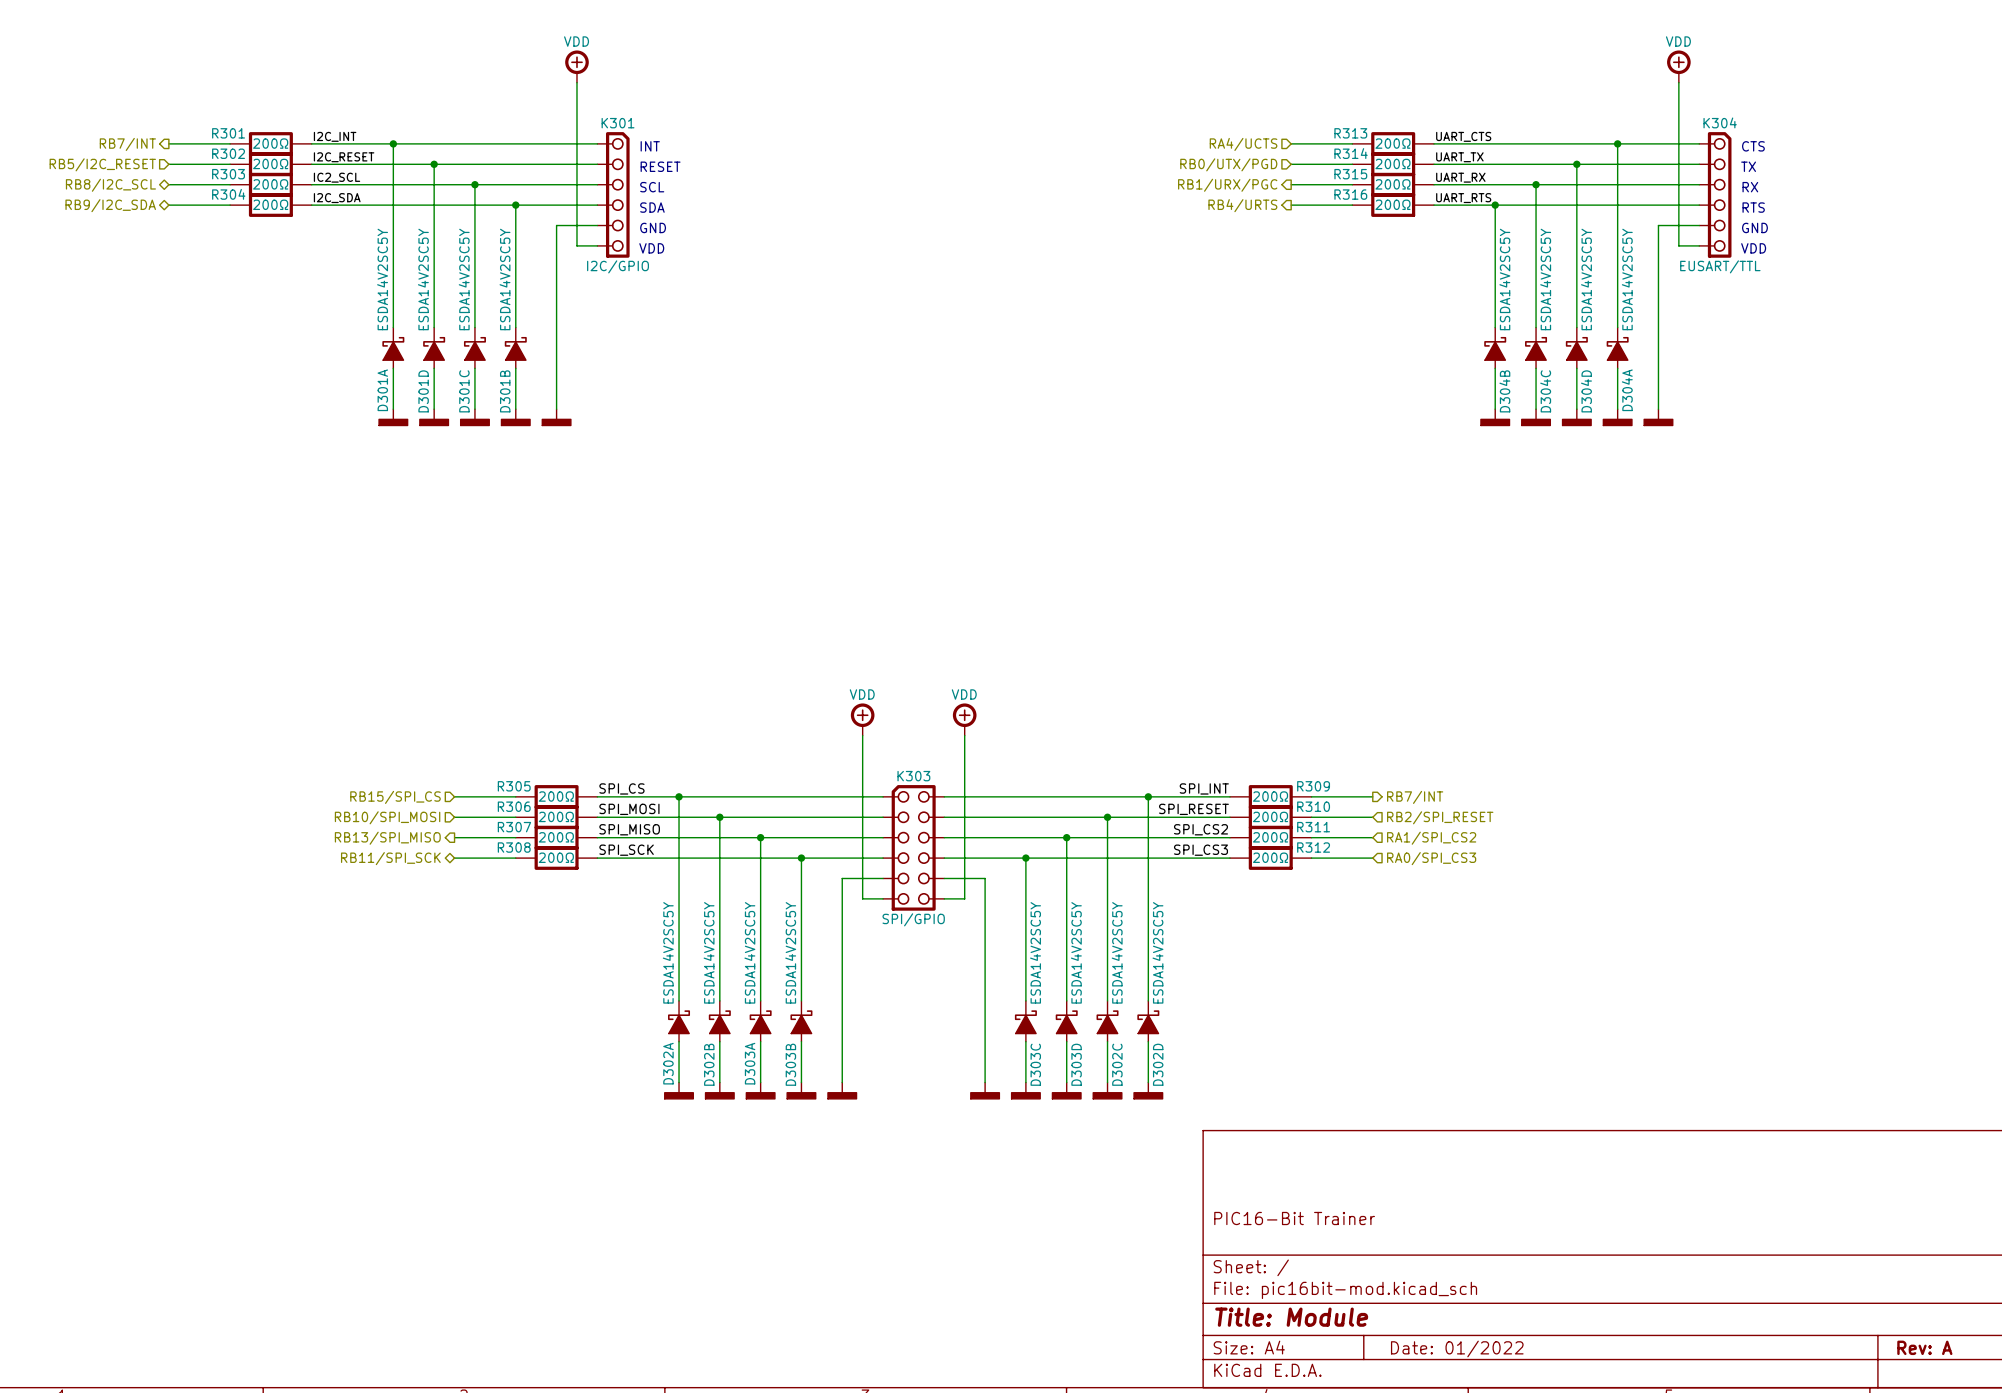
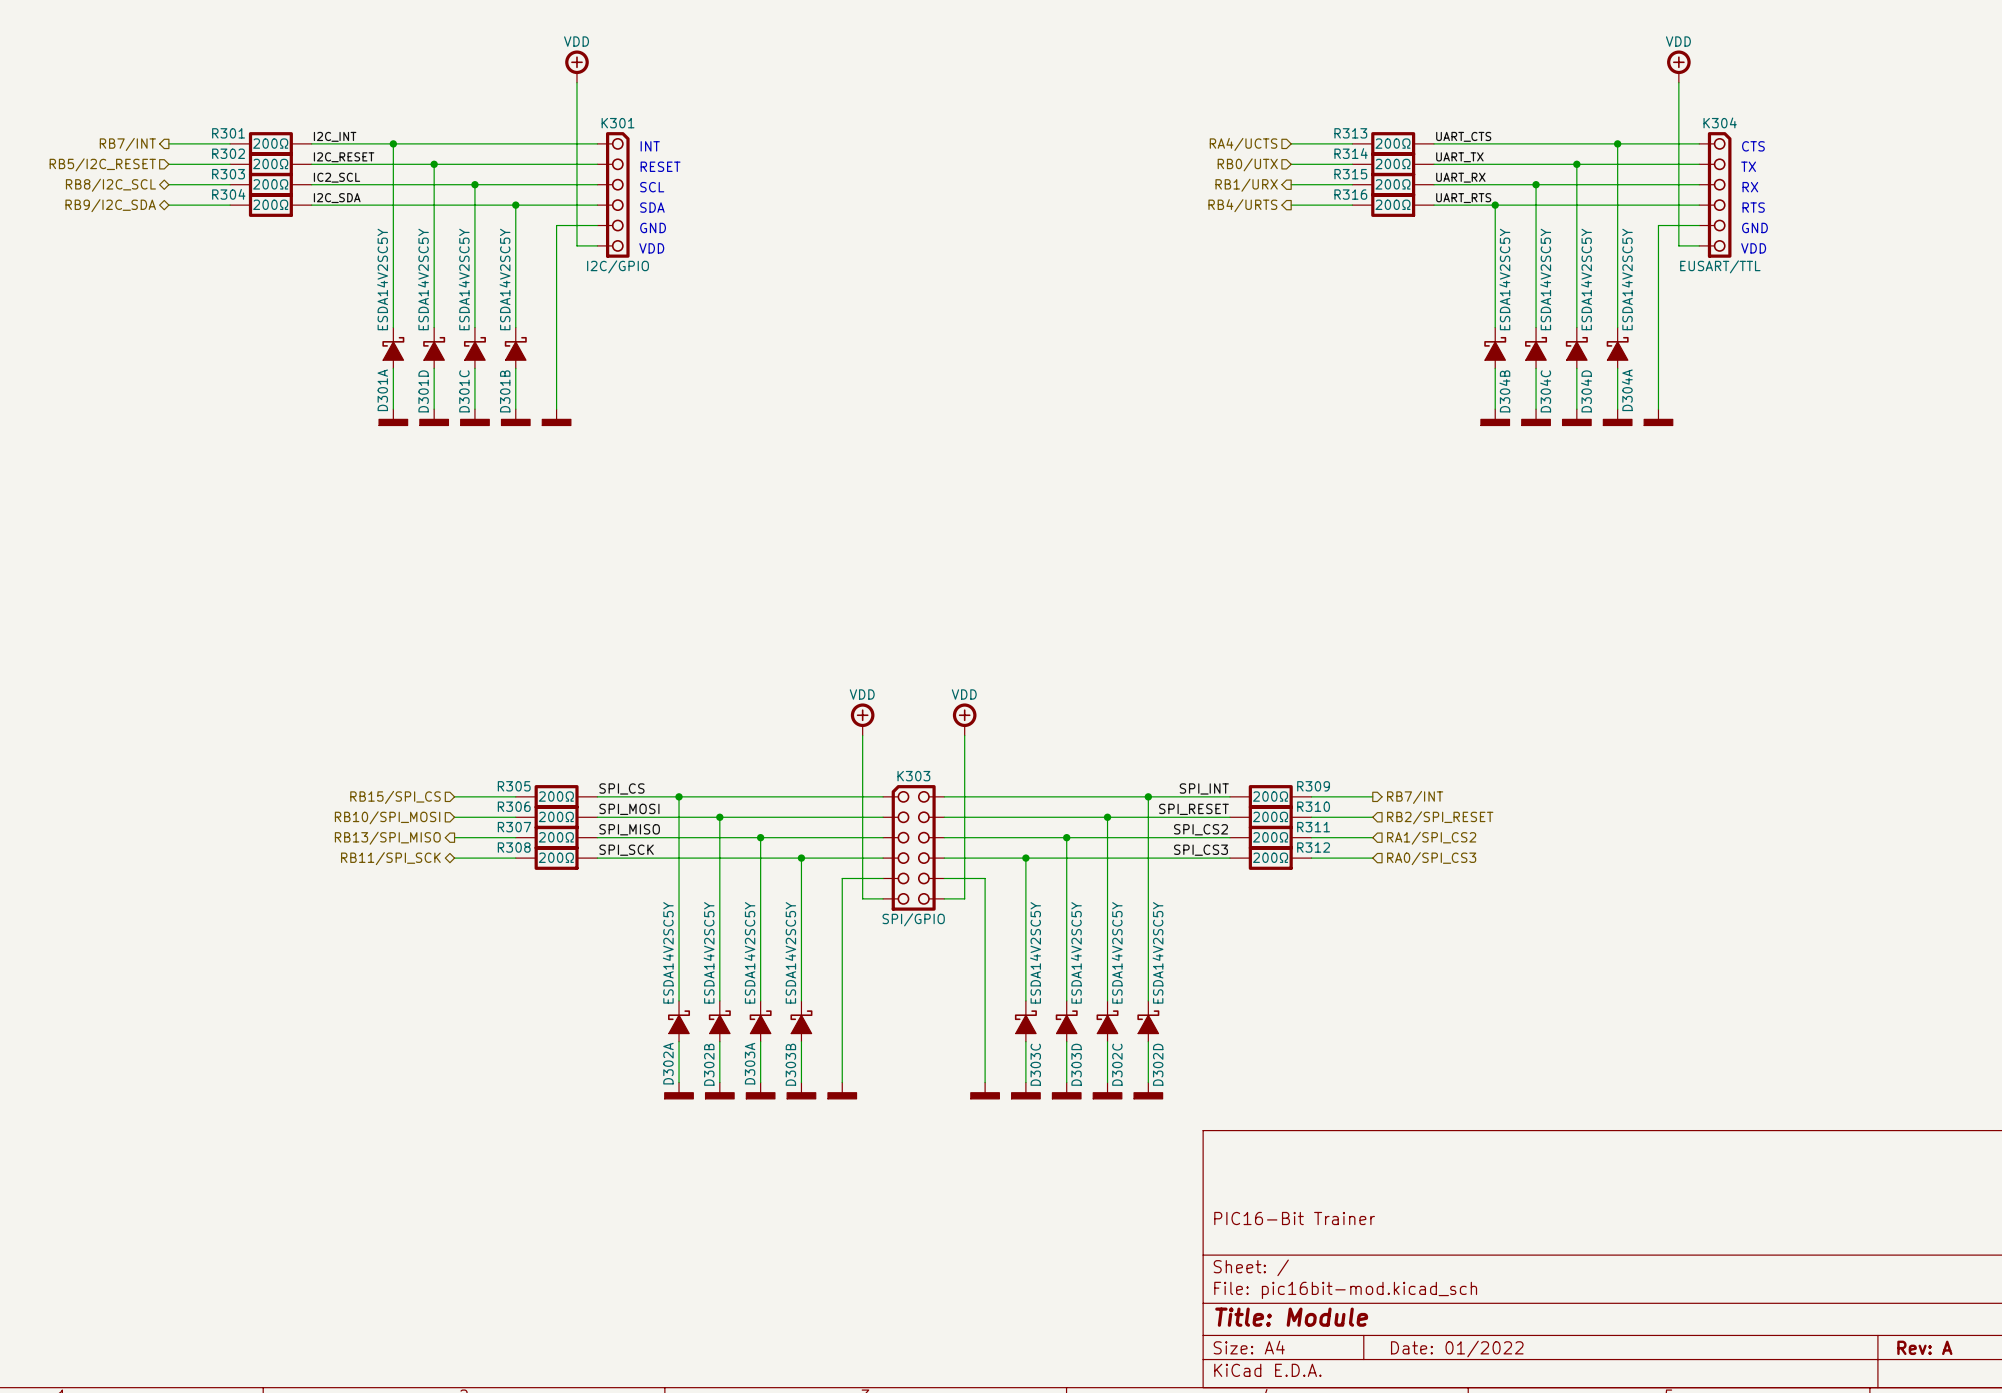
hierarchical label: RB0/UTX/PGD (1228, 164) -> RB0/UTX (1247, 164)
hierarchical label: RB1/URX/PGC (1227, 185) -> RB1/URX (1246, 185)

